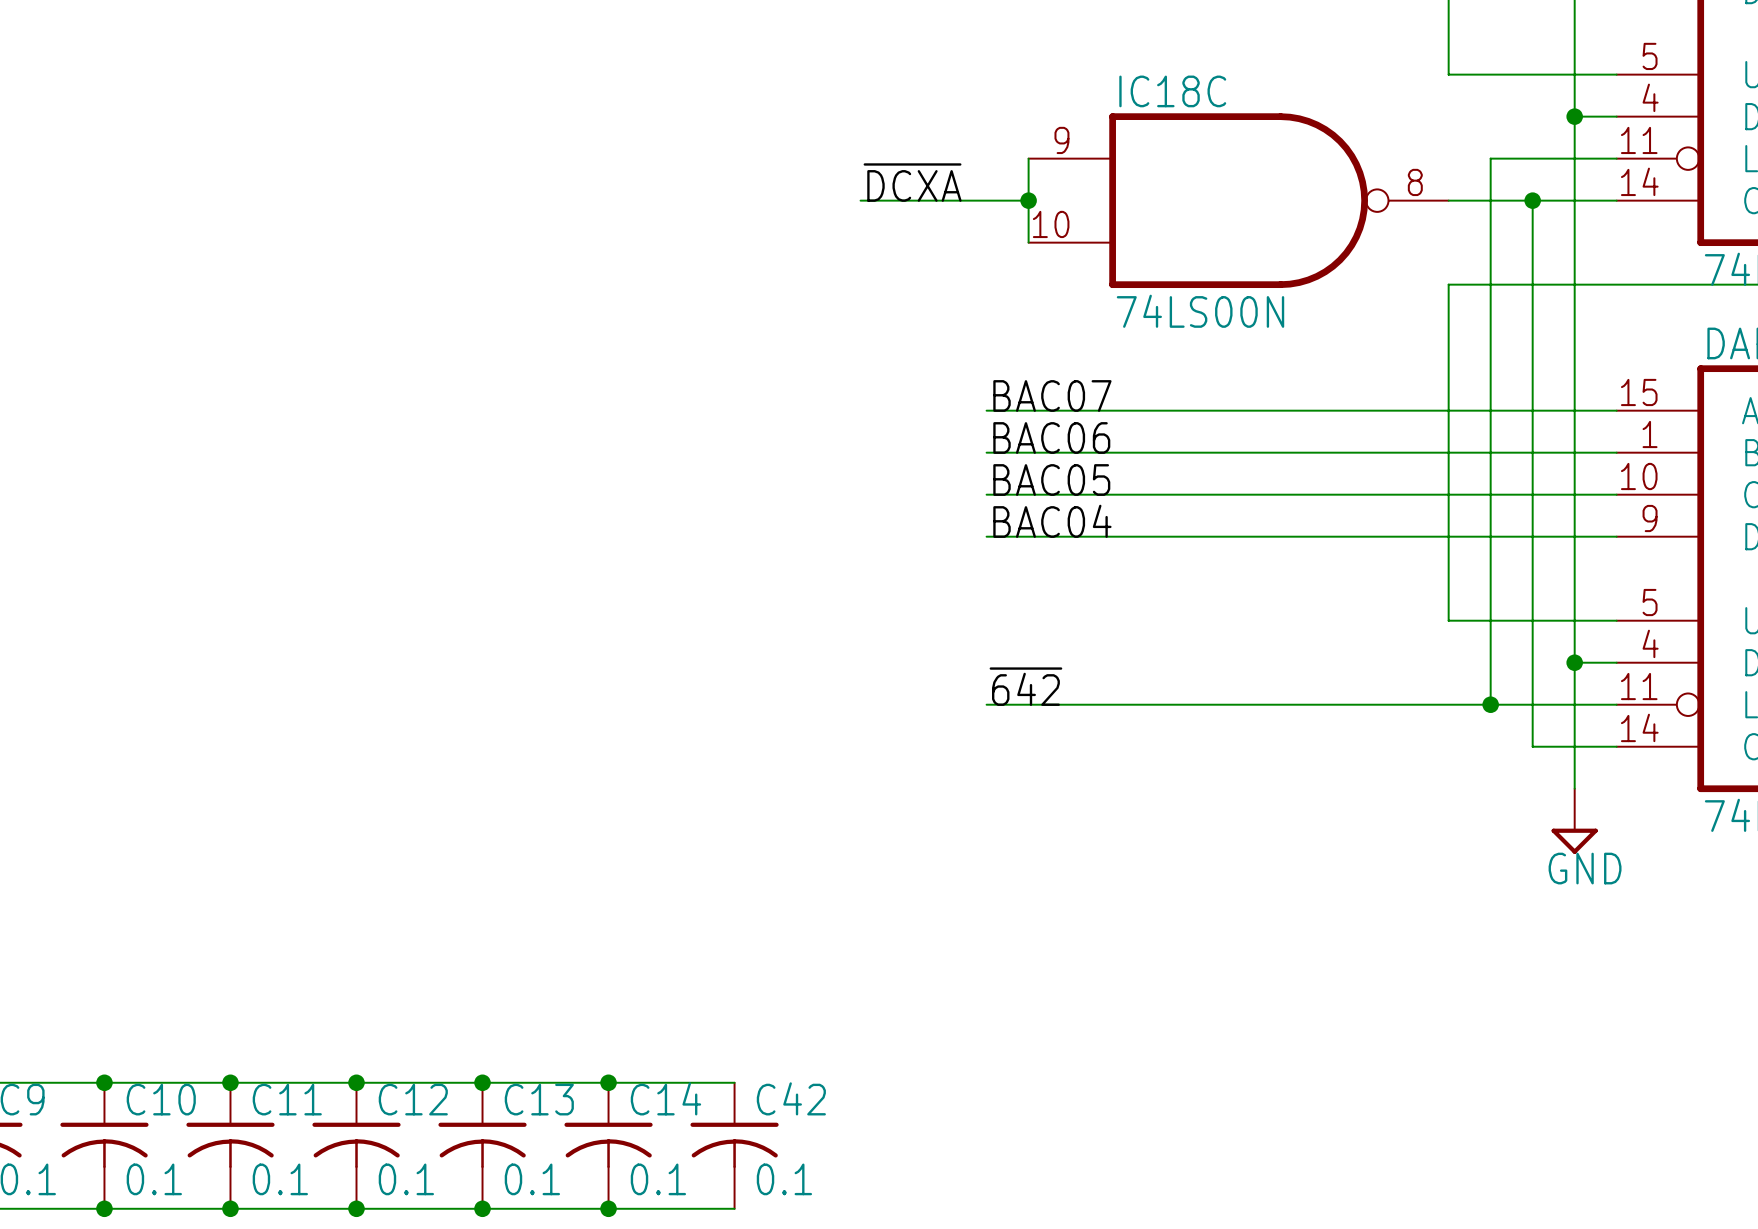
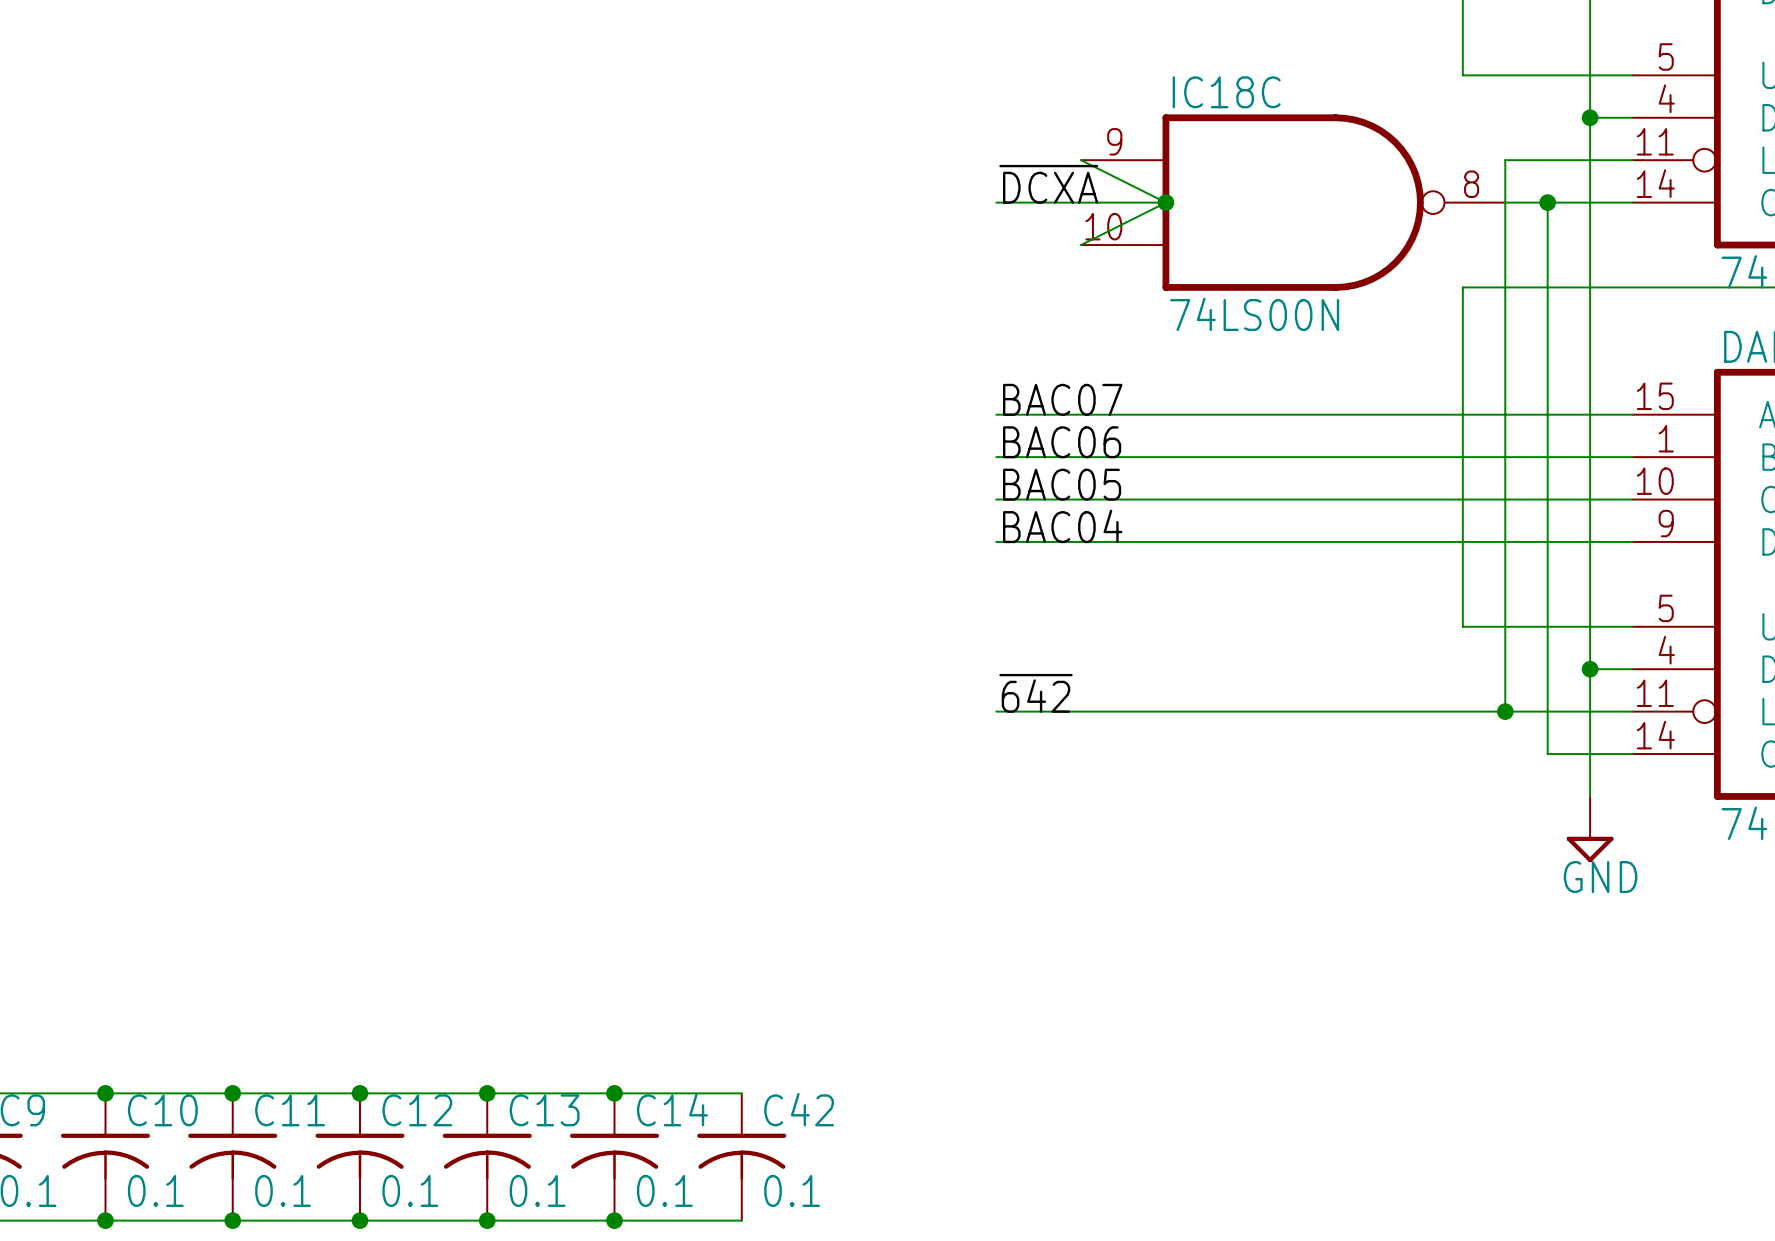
wire: (1028, 158) (1028, 242) -> none
wire: none -> (1081, 160) (1165, 202)
label position: ~{DCXA} (912, 182) -> ~{DCXA} (1048, 184)
wire: (860, 200) (986, 200) -> (1038, 202) (1165, 202)
junction: (1028, 200) -> none
wire: none -> (1165, 202) (1081, 245)
junction: none -> (1165, 202)
IC18C position: (1238, 200) -> (1293, 202)

